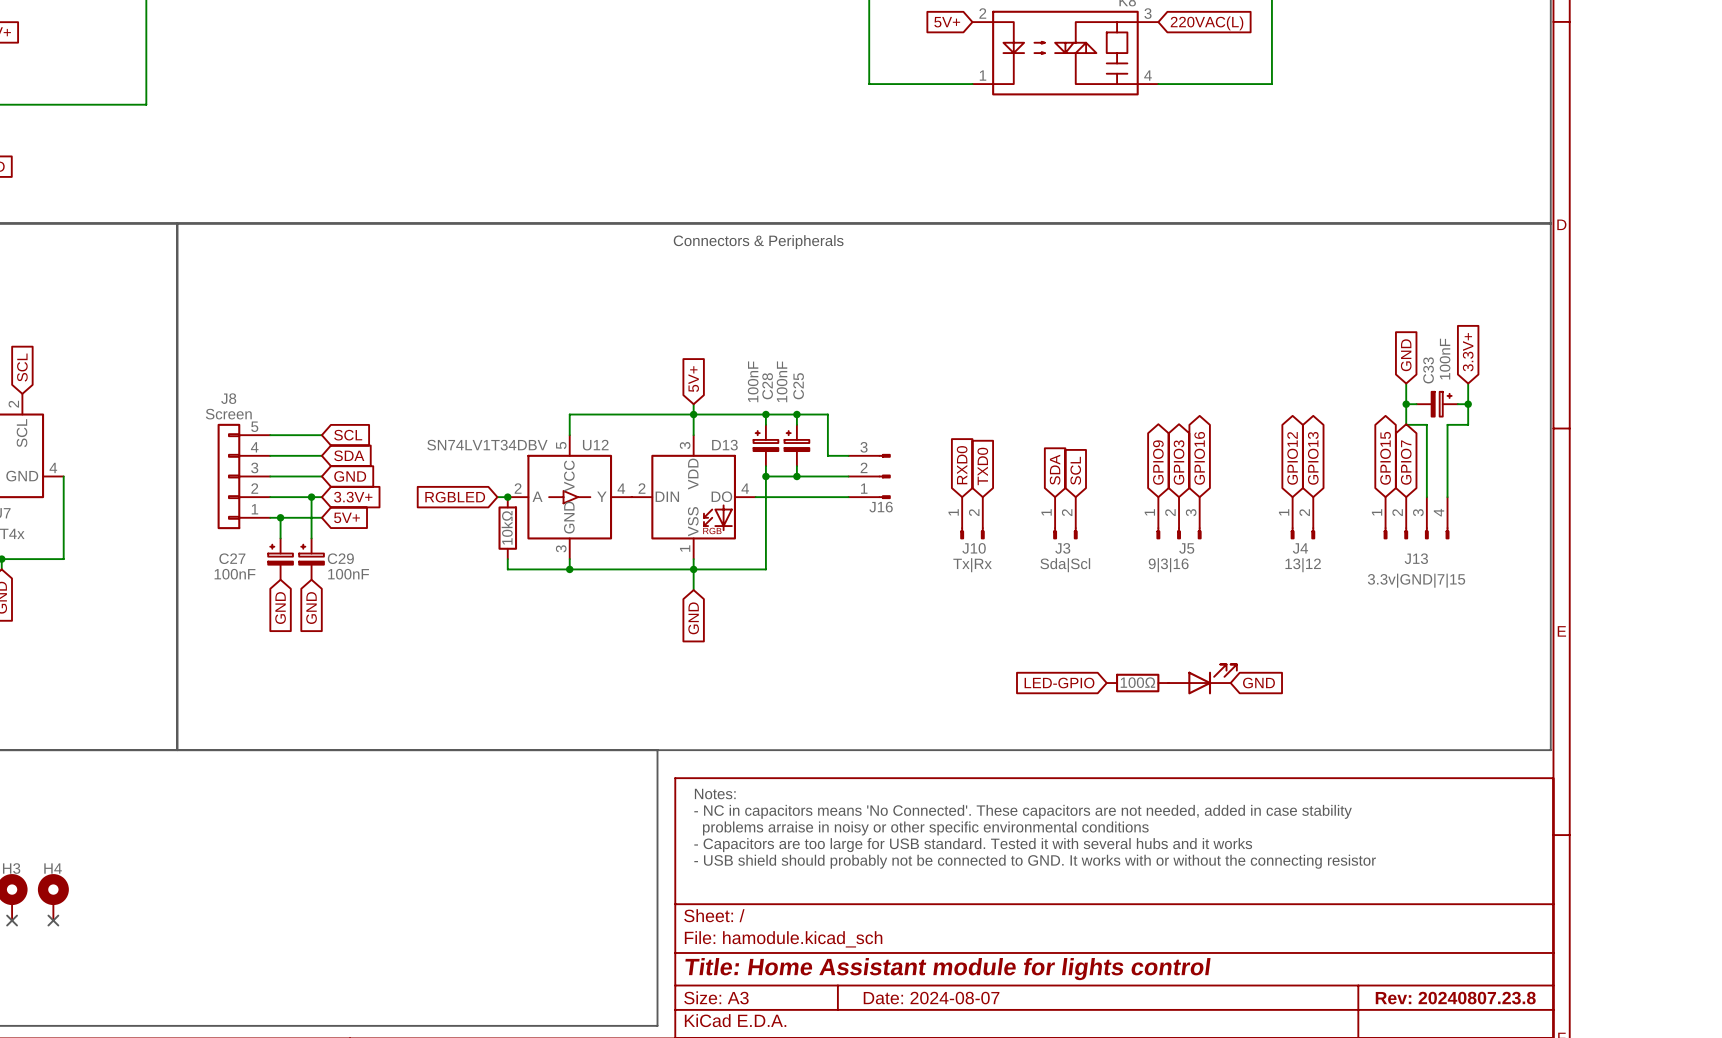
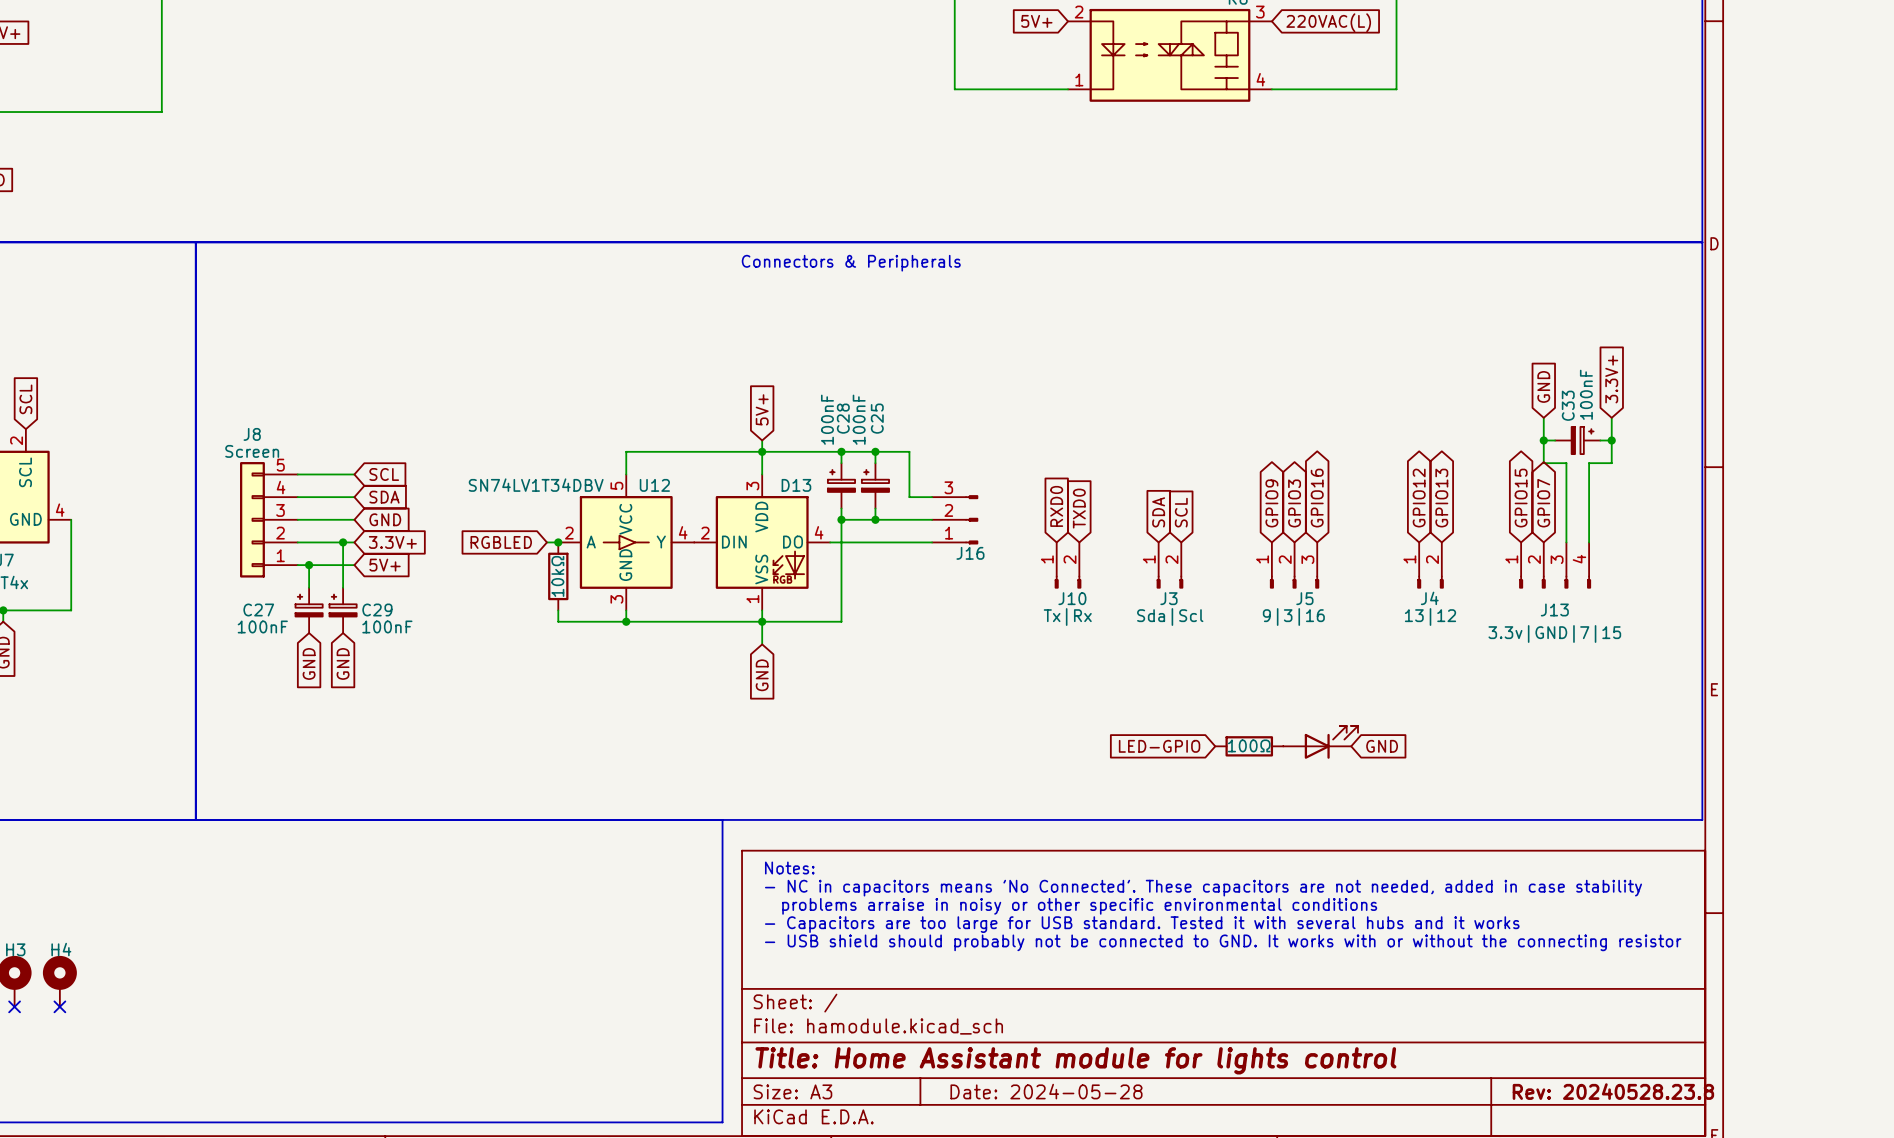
title block: Date: 2024-08-07 (931, 998) -> Date: 2024-05-28 (1046, 1091)
title block: Rev: 20240807.23.8 (1455, 998) -> Rev: 20240528.23.8 (1613, 1091)

